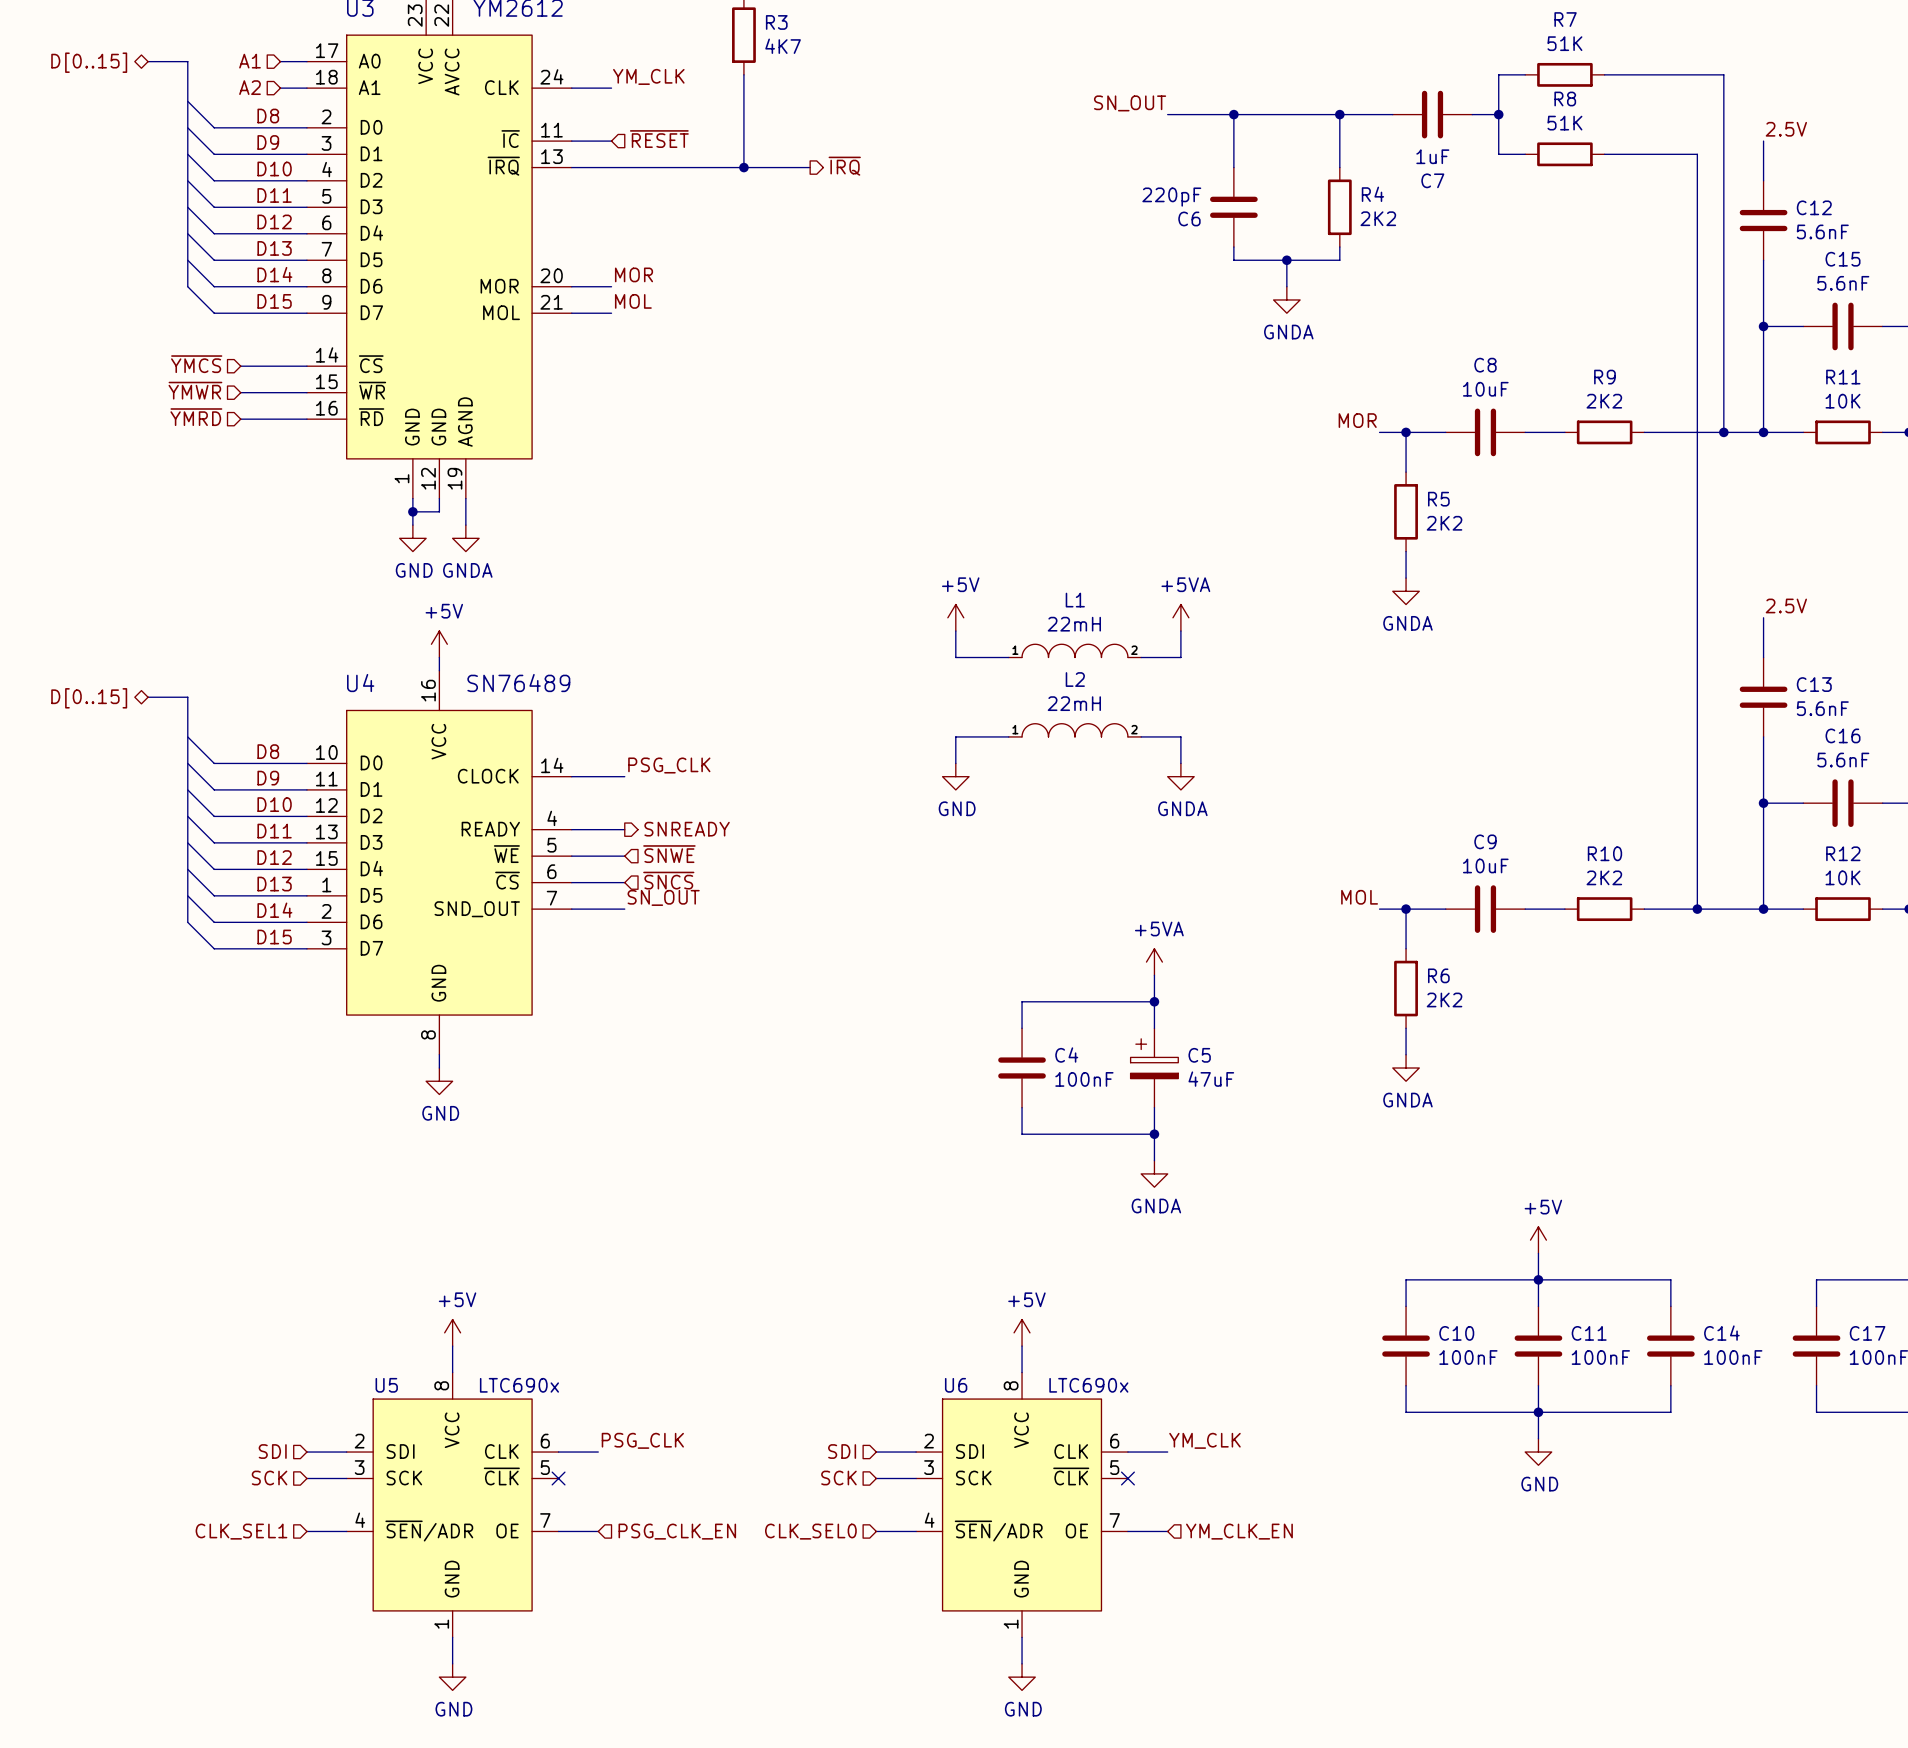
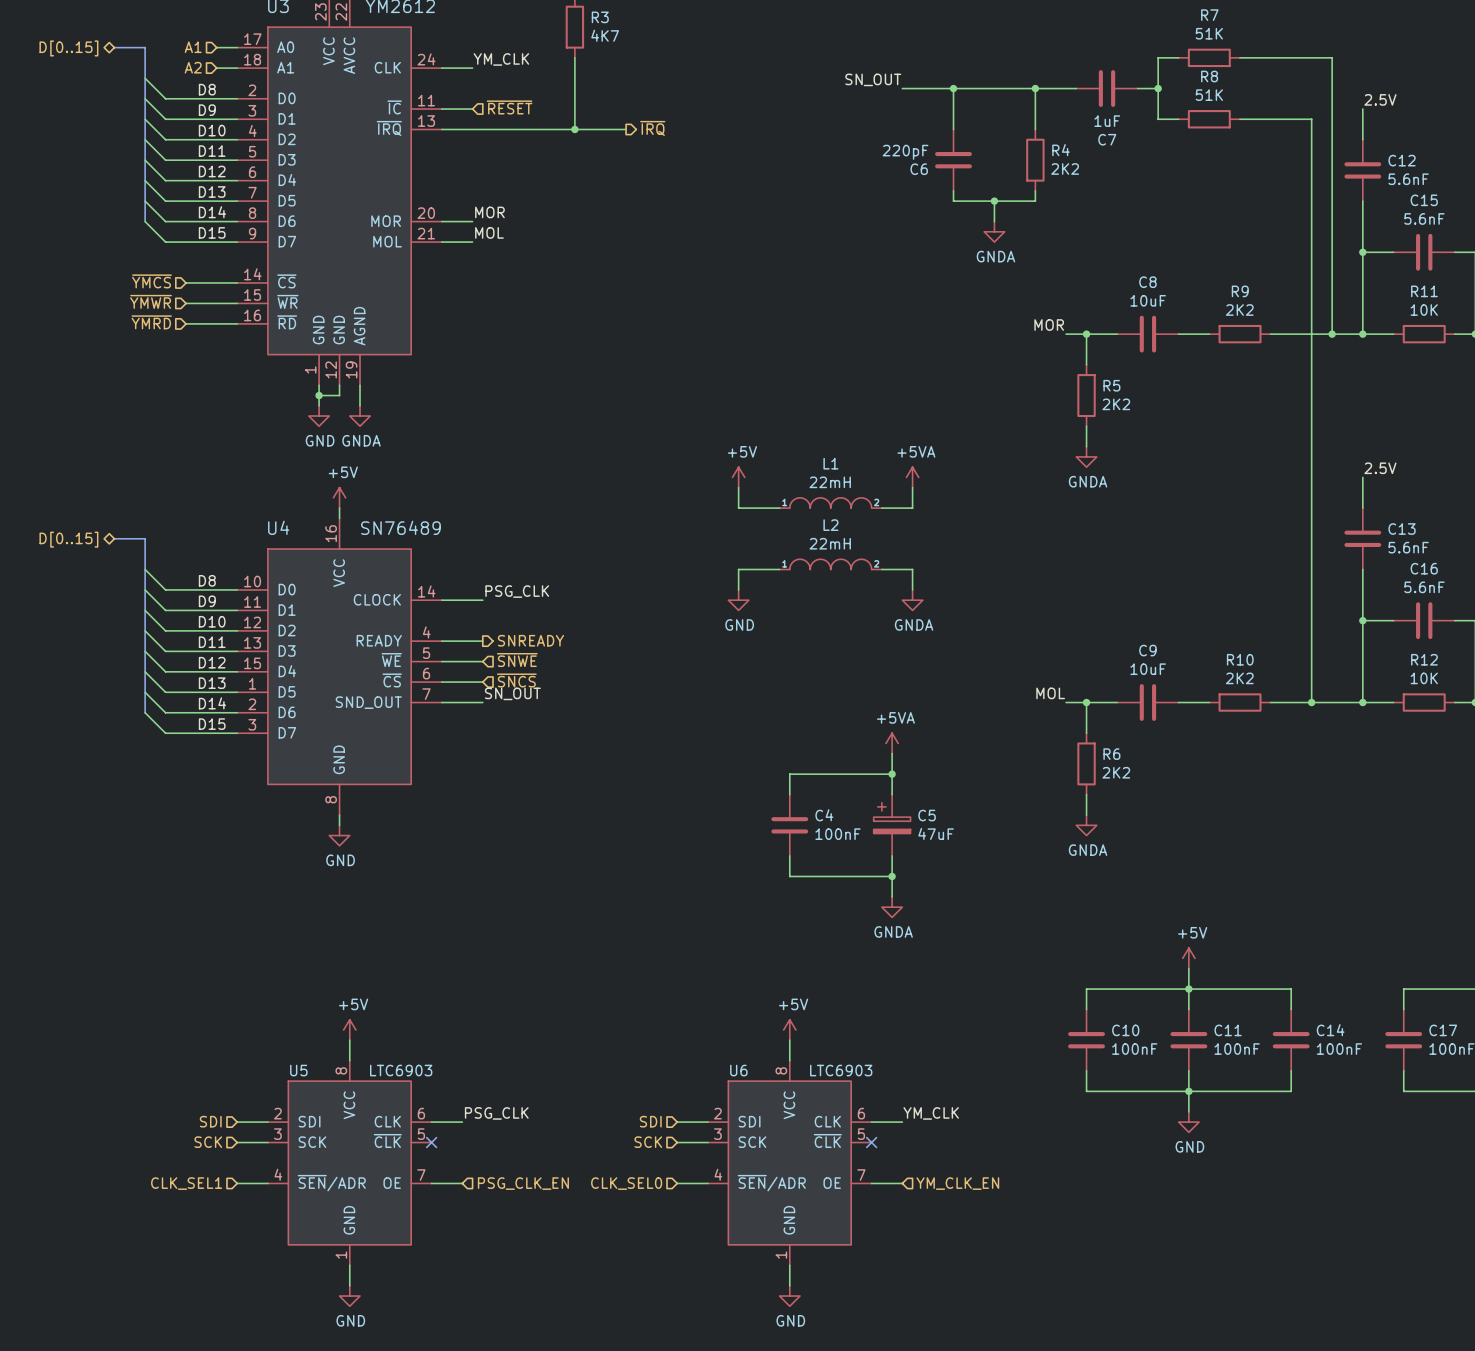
U5 value: LTC690x (519, 1385) -> LTC6903 (401, 1070)
U6 value: LTC690x (1088, 1385) -> LTC6903 (841, 1070)

